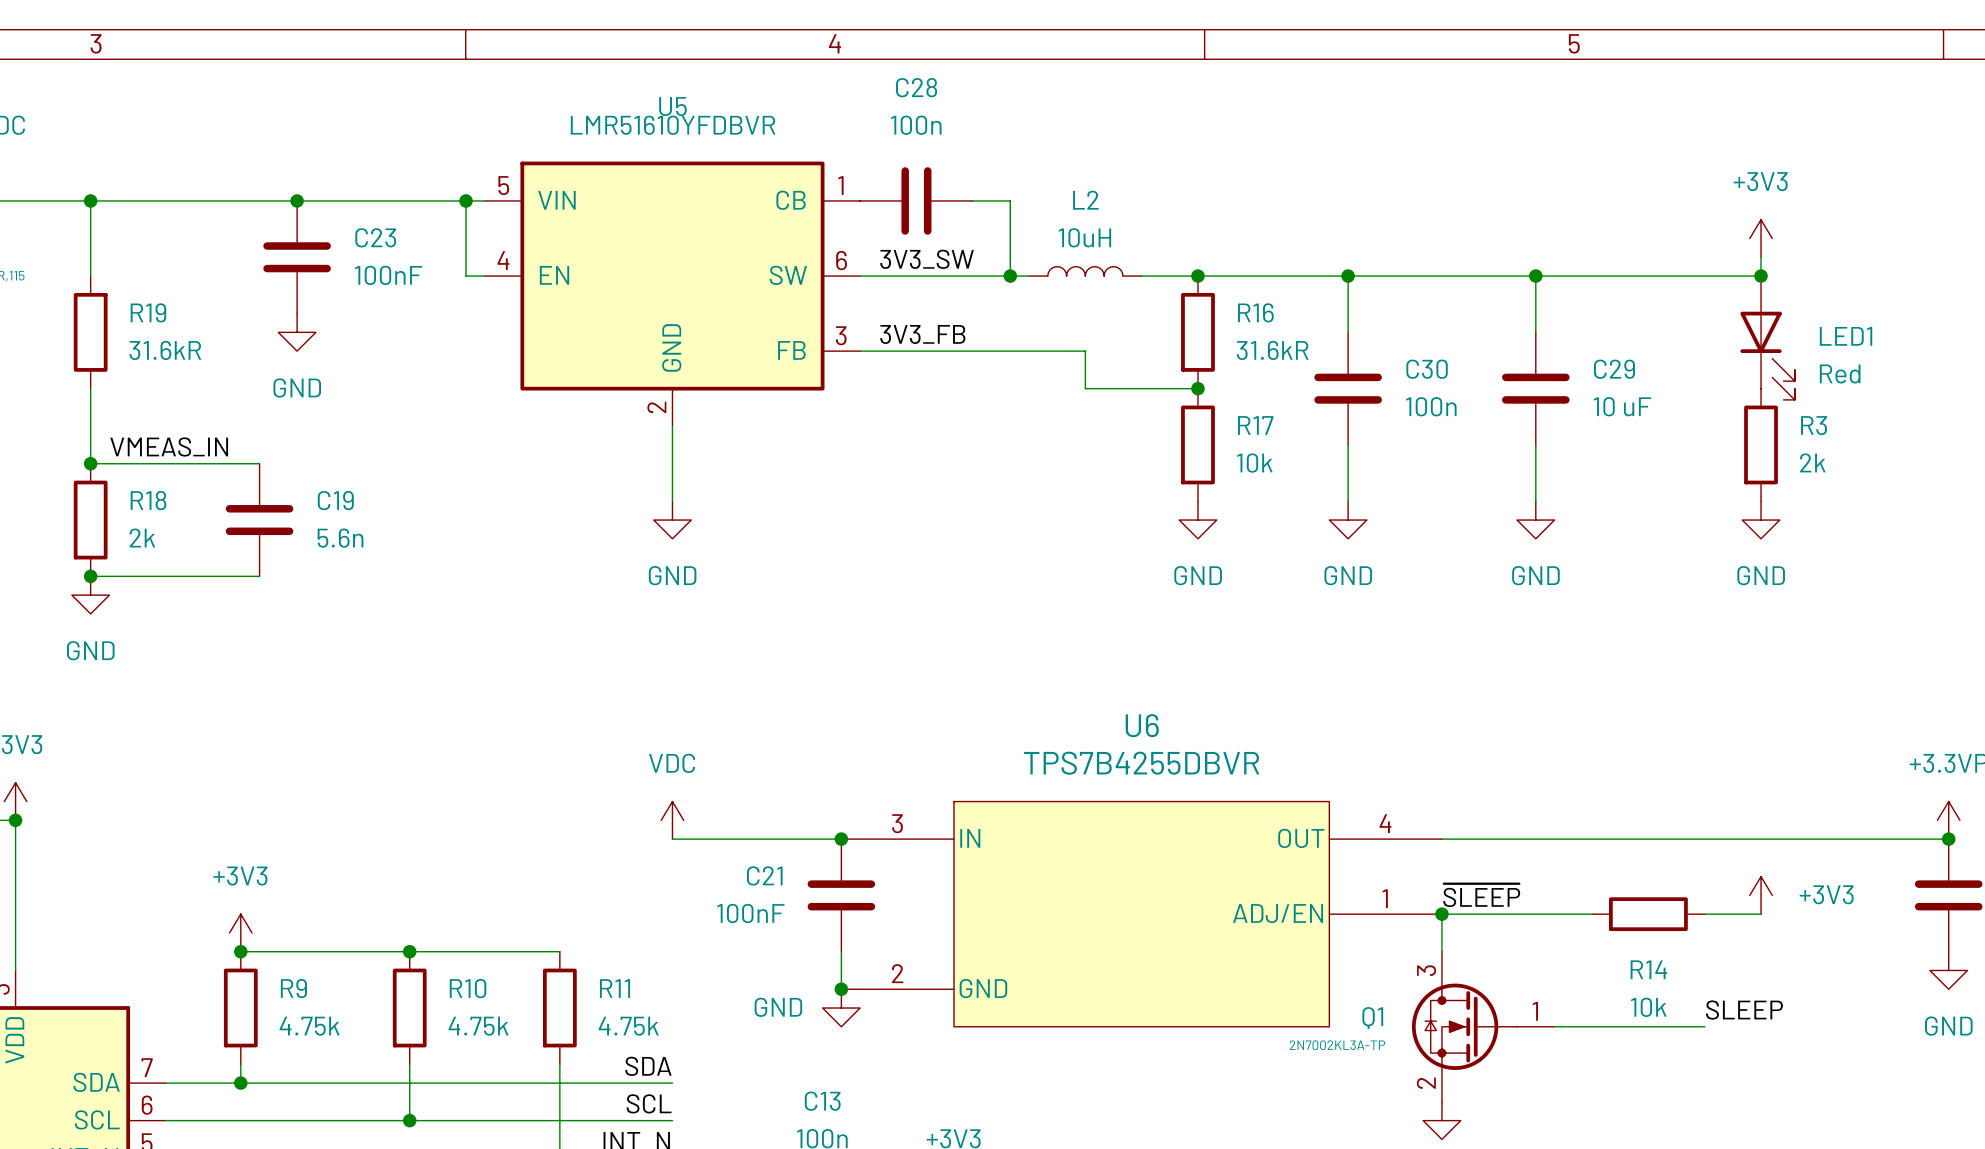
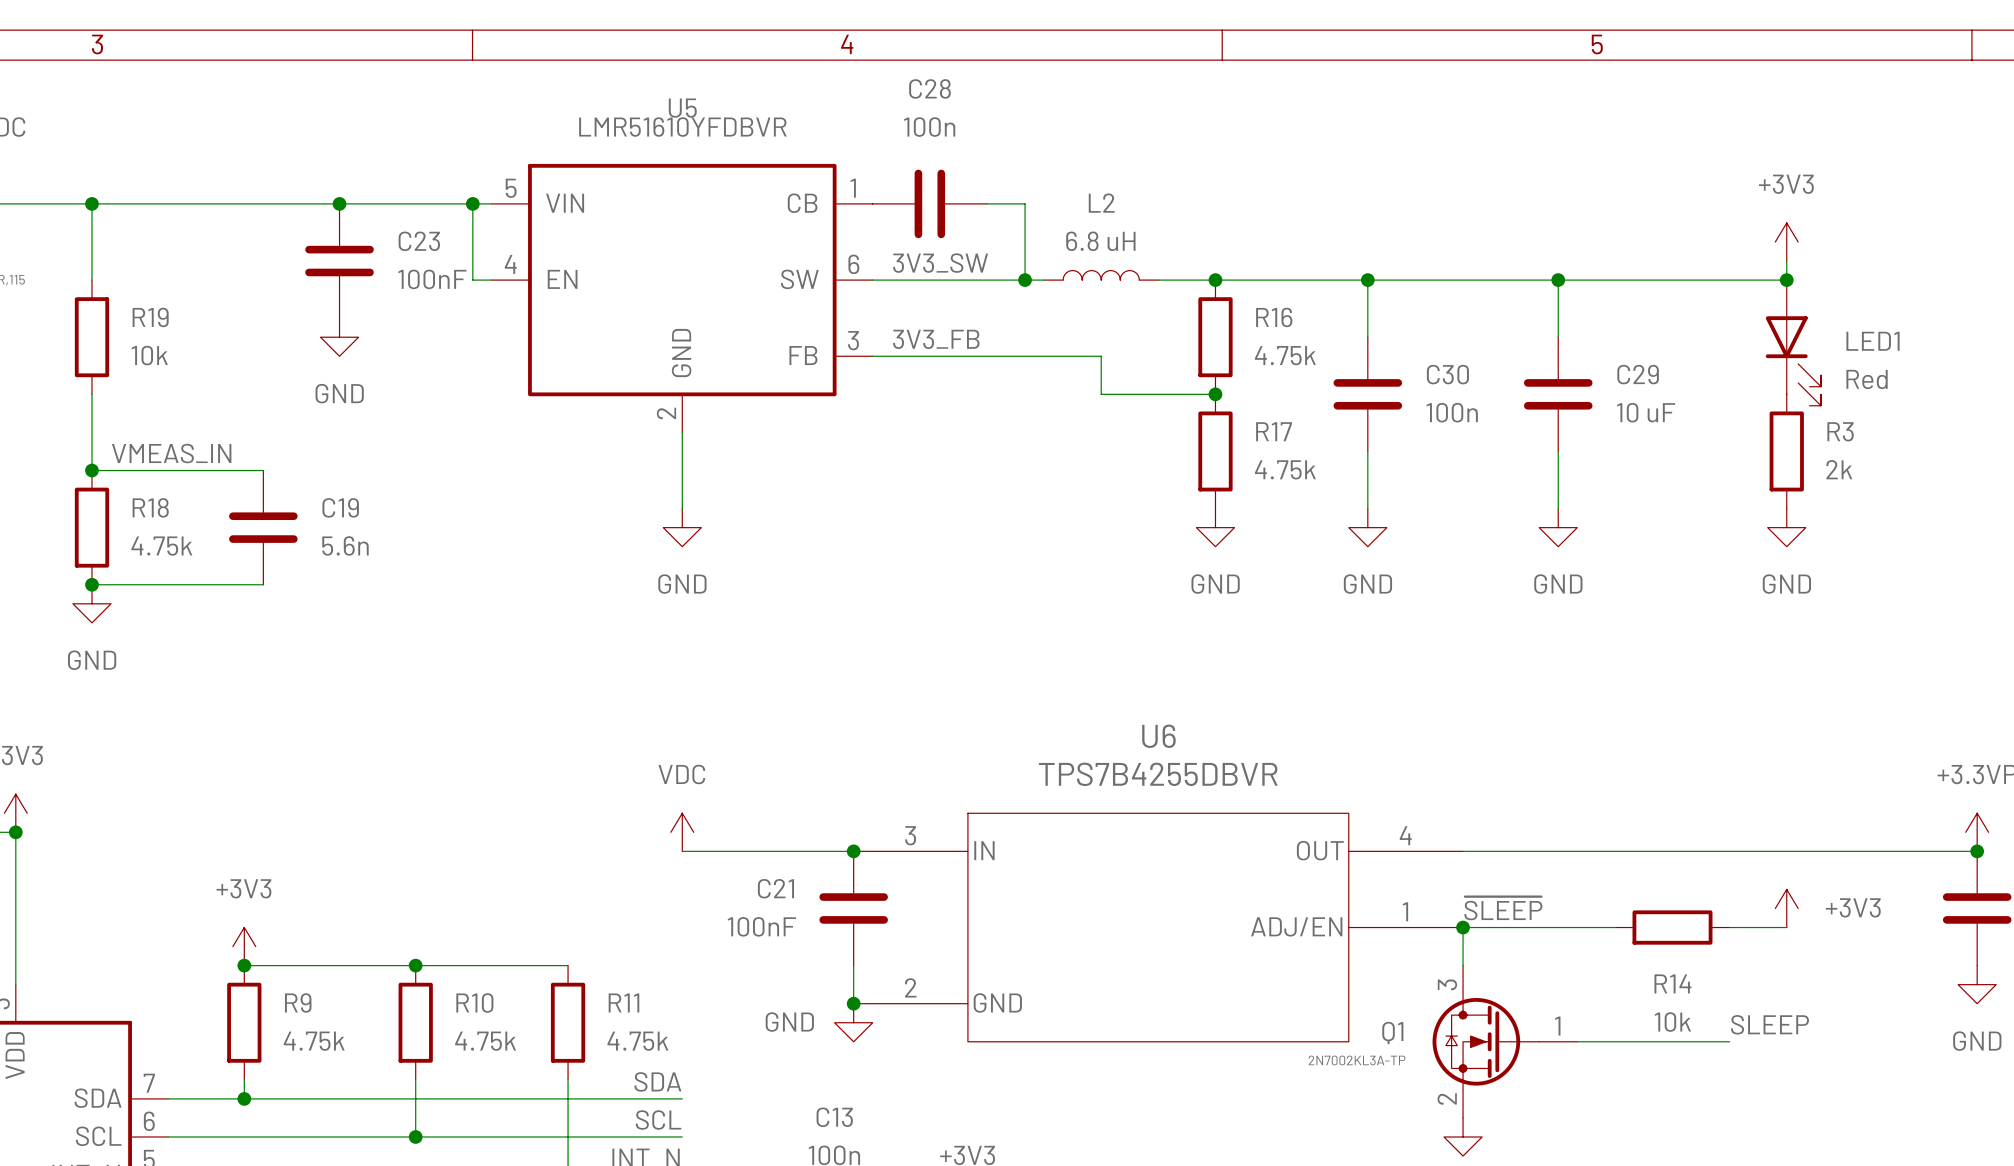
junction position: (297, 200) -> (339, 203)
L2 value: 10uH (1084, 237) -> 6.8 uH (1100, 241)
C23 position: (297, 257) -> (339, 261)
power symbol position: GND (297, 332) -> GND (339, 337)
R19 value: 31.6kR (165, 350) -> 10k (149, 355)
R16 value: 31.6kR (1272, 350) -> 4.75k (1285, 355)
R17 value: 10k (1254, 463) -> 4.75k (1285, 469)
R18 value: 2k (142, 538) -> 4.75k (161, 546)

